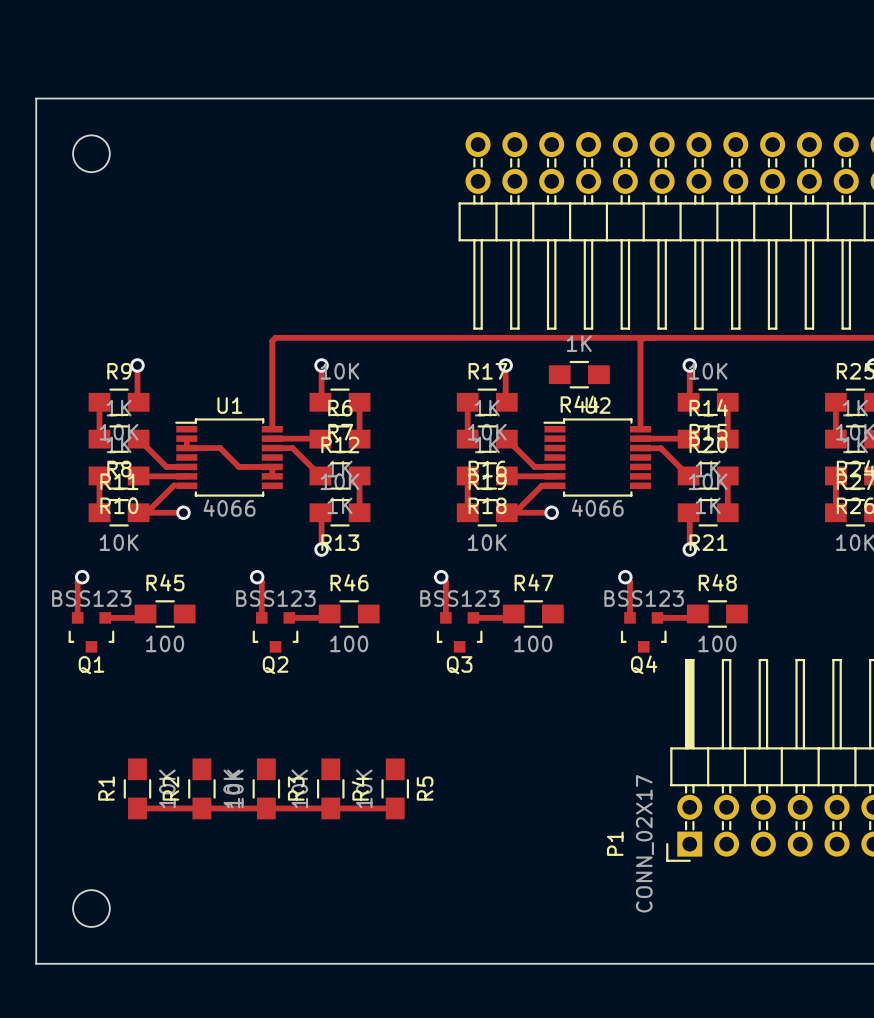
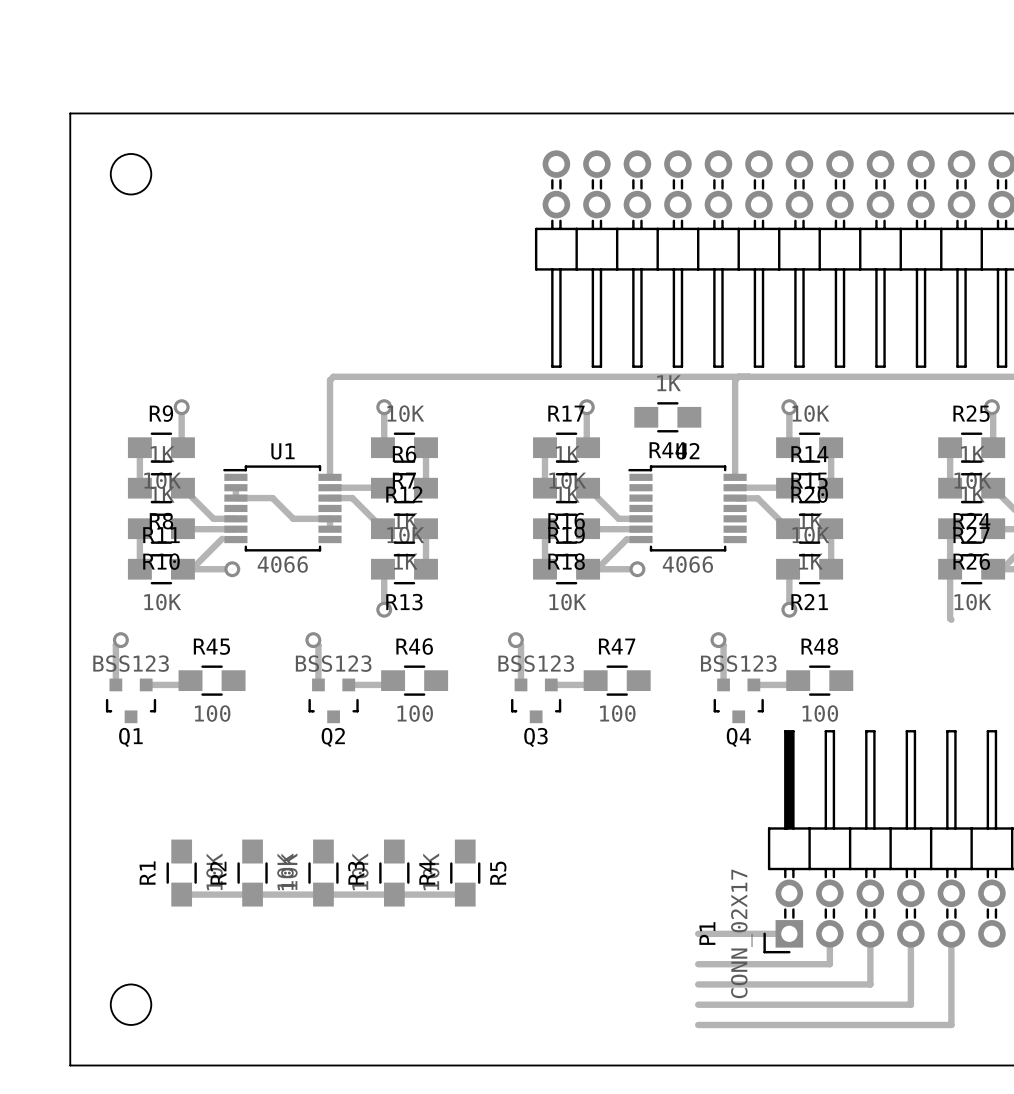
track: none -> (950, 569) (951, 619)
track: none -> (698, 933) (789, 933)
track: none -> (829, 933) (829, 964) (698, 964)
track: none -> (870, 933) (870, 984) (698, 984)
track: none -> (910, 933) (910, 1004) (698, 1004)
track: none -> (951, 933) (951, 1024) (698, 1024)

